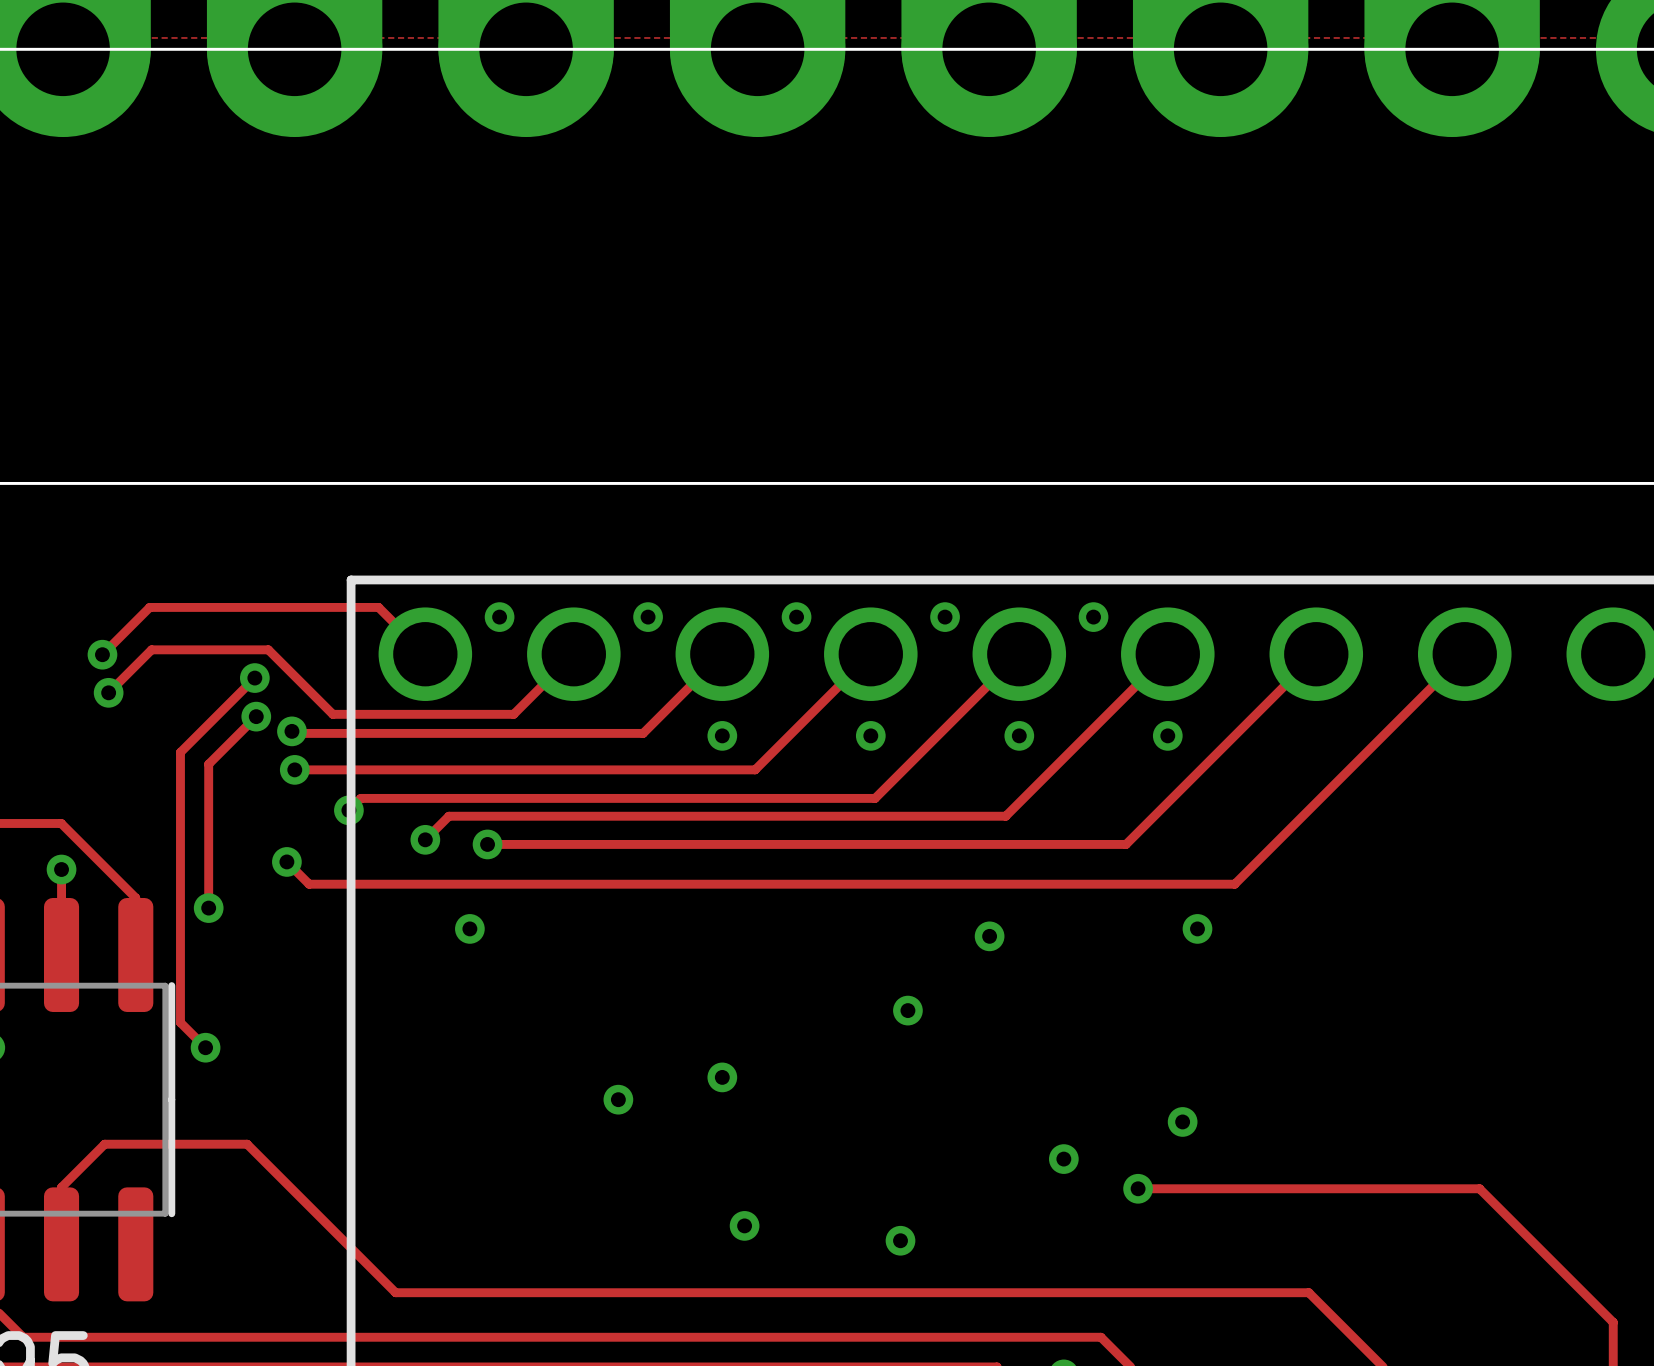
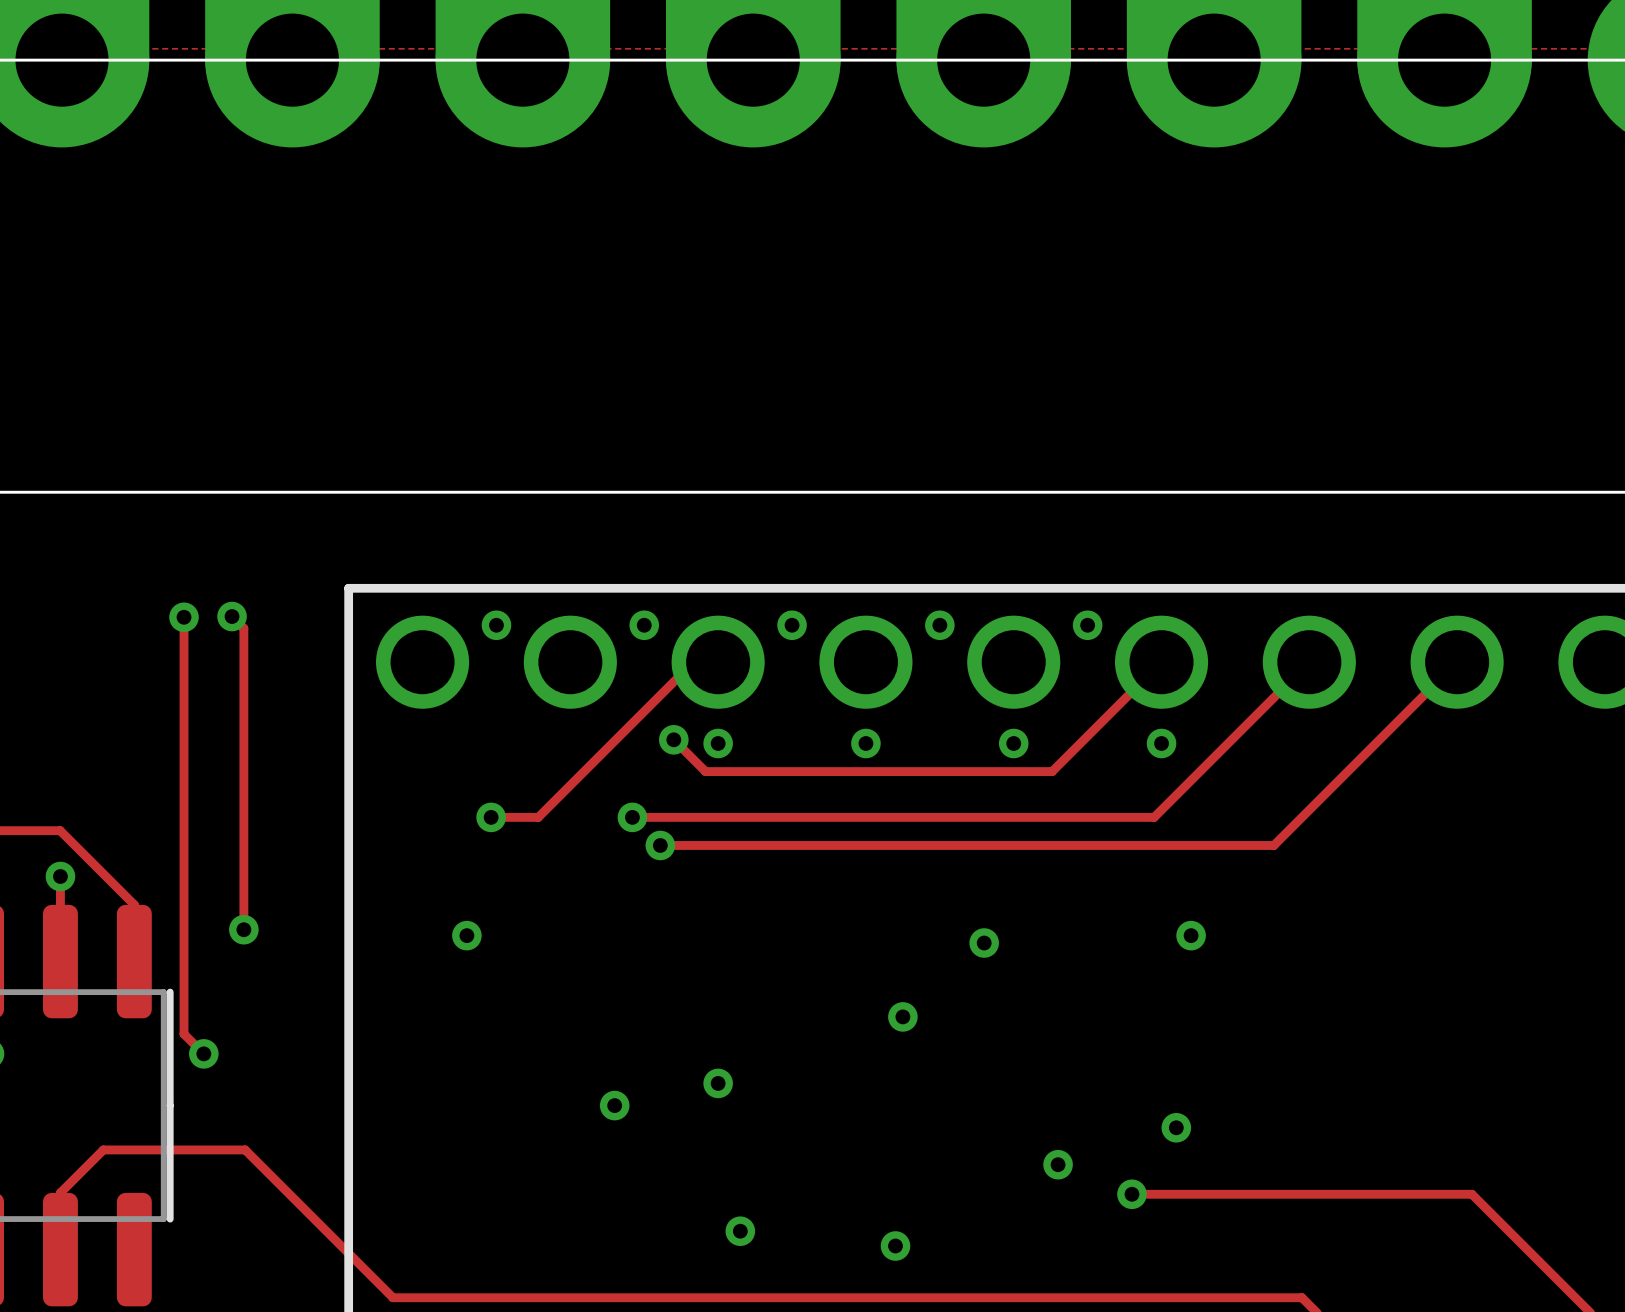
track: none -> (232, 616) (243, 628) (243, 929)
via: none -> (232, 616)
via: none -> (184, 617)
via: (102, 654) -> none
track: (425, 654) (378, 607) (149, 607) (102, 654) -> none
track: (573, 654) (513, 714) (332, 714) (268, 649) (151, 649) (108, 692) -> none
track: (722, 654) (643, 733) (294, 733) (291, 731) -> (718, 662) (693, 662) (538, 817) (491, 817)
track: (870, 654) (755, 769) (294, 769) -> none
track: (1019, 654) (875, 798) (360, 798) (348, 810) -> none
track: (254, 678) (180, 752) (180, 1022) (185, 1027) -> (184, 617) (184, 1034)
via: (254, 678) -> none
via: (108, 692) -> none
track: (256, 716) (208, 764) (208, 908) -> none
via: (256, 716) -> none
via: (291, 731) -> none
via: none -> (673, 739)
track: (1057, 764) (1005, 816) (448, 816) (425, 839) -> (1052, 771) (705, 771) (673, 739)
via: (294, 769) -> none
via: (348, 810) -> none
via: none -> (632, 817)
track: (1160, 810) (1126, 844) (487, 844) -> (1154, 817) (632, 817)
via: none -> (660, 845)
track: (1280, 838) (1234, 884) (309, 884) (286, 861) -> (1273, 845) (660, 845)
via: (425, 839) -> none
via position: (487, 844) -> (491, 817)
via: (286, 861) -> none
via: (208, 908) -> none
via: none -> (243, 929)

